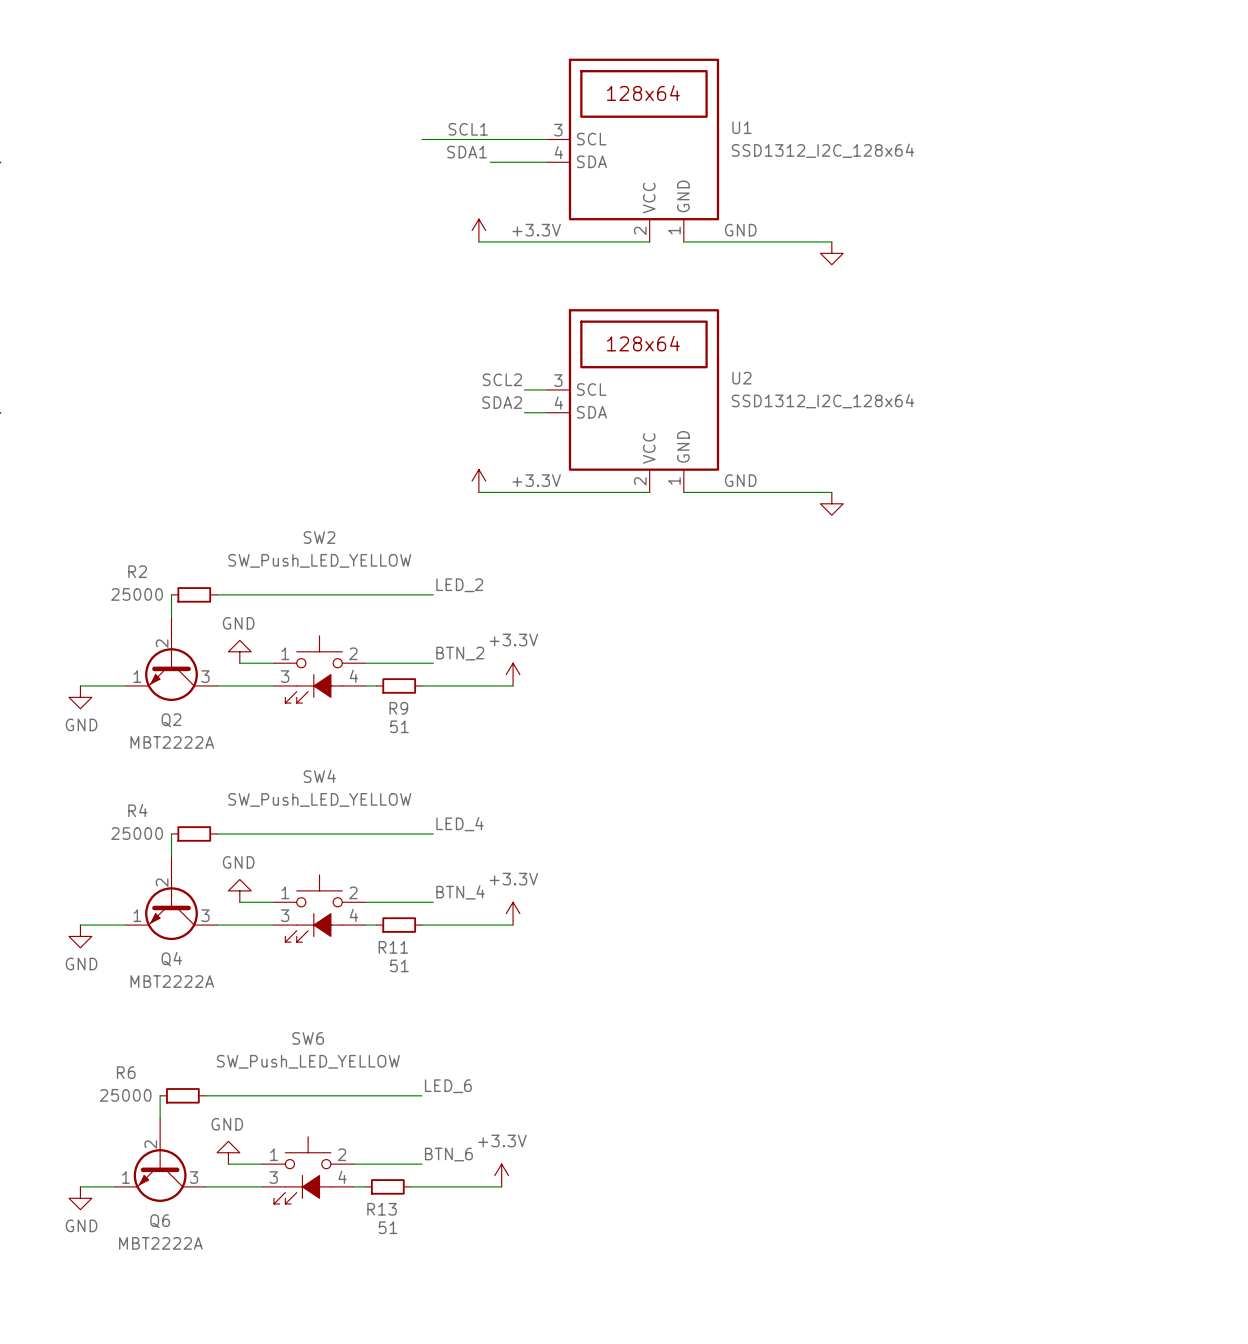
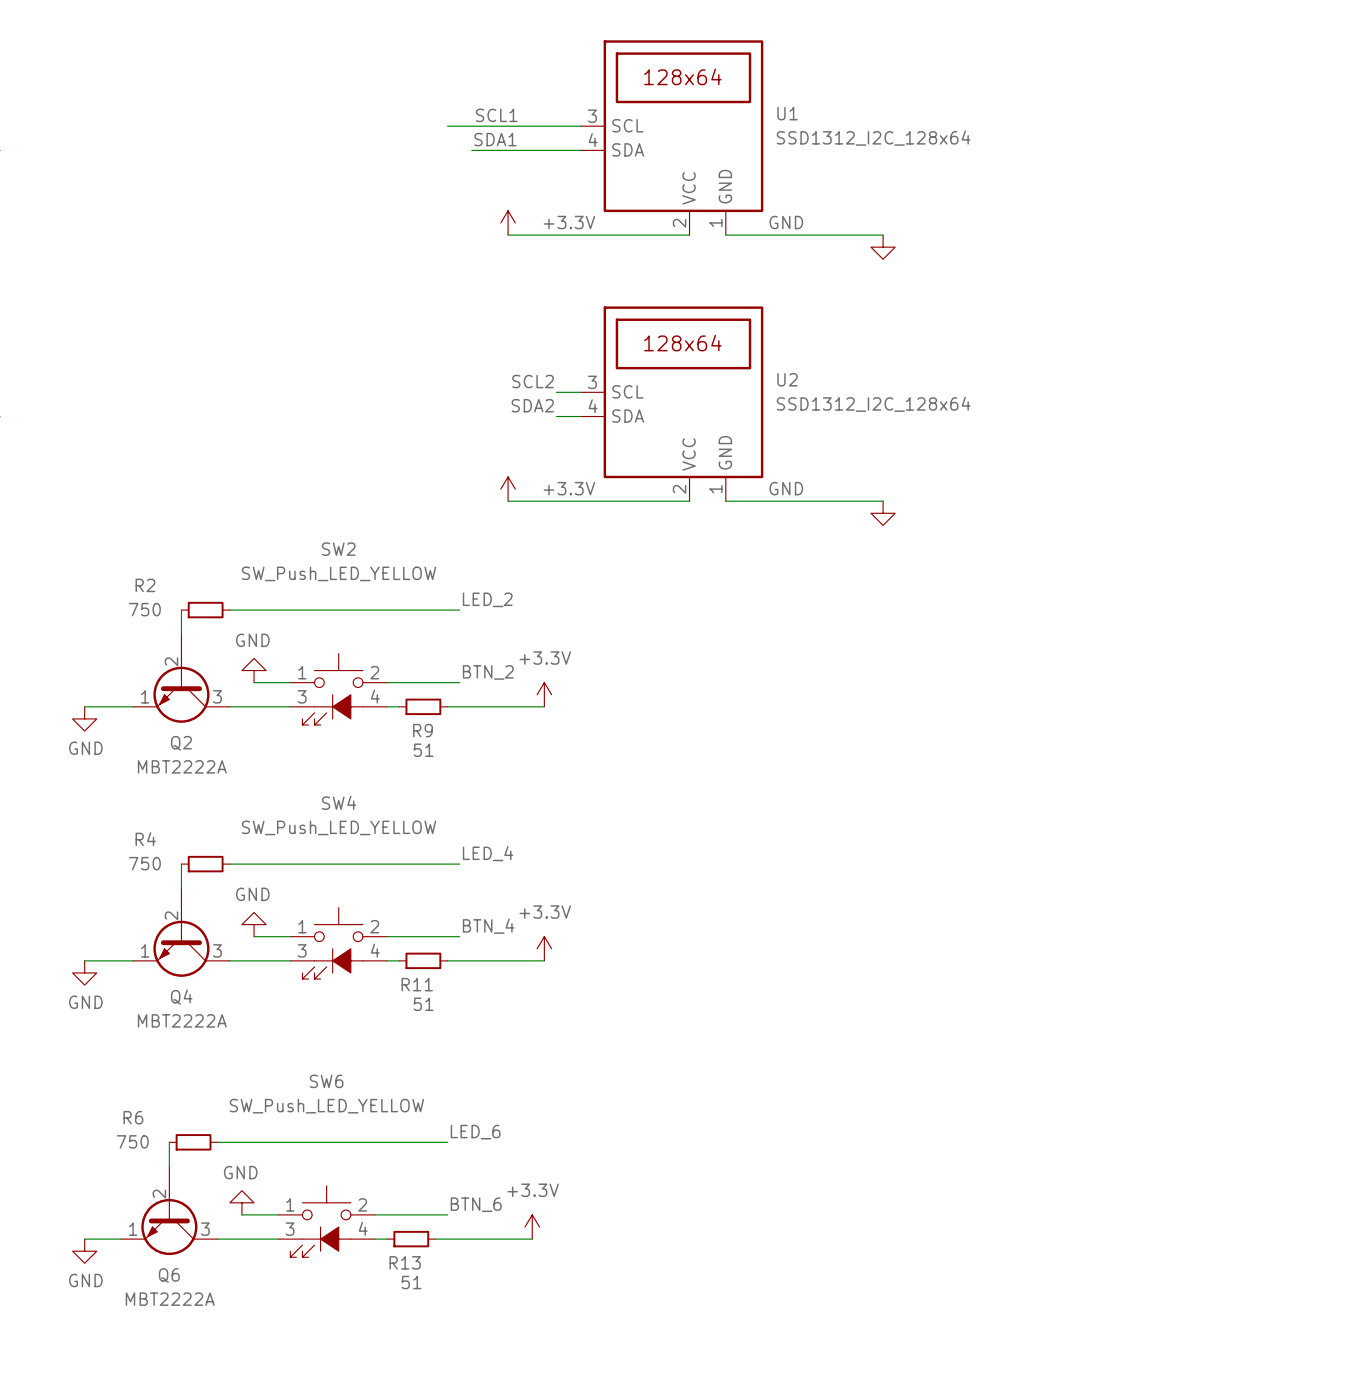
wire: none -> (471, 150) (520, 150)
R2 value: 25000 (137, 594) -> 750 (144, 609)
R4 value: 25000 (137, 833) -> 750 (144, 863)
R6 value: 25000 (125, 1095) -> 750 (132, 1141)

